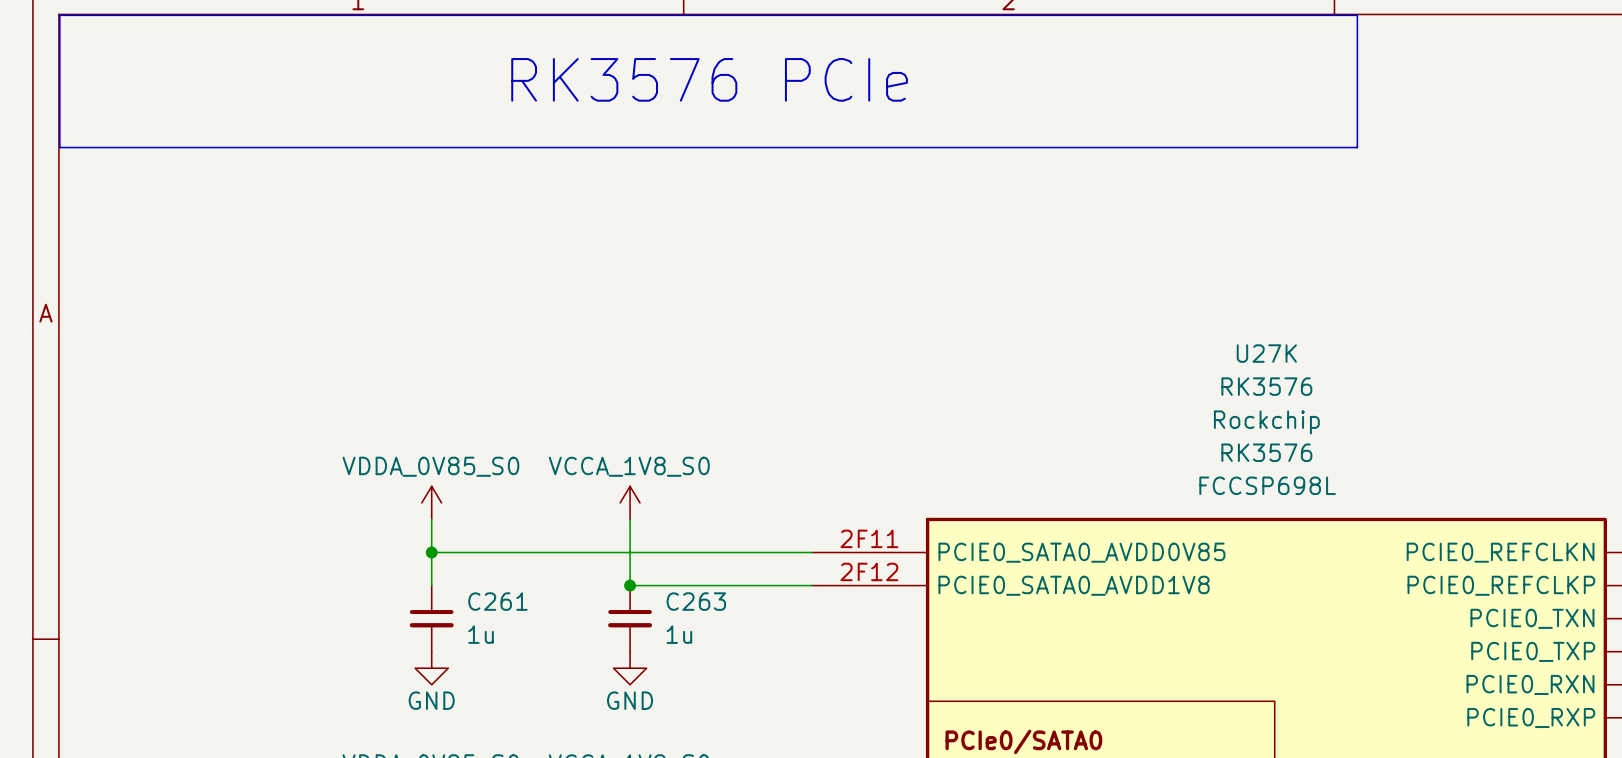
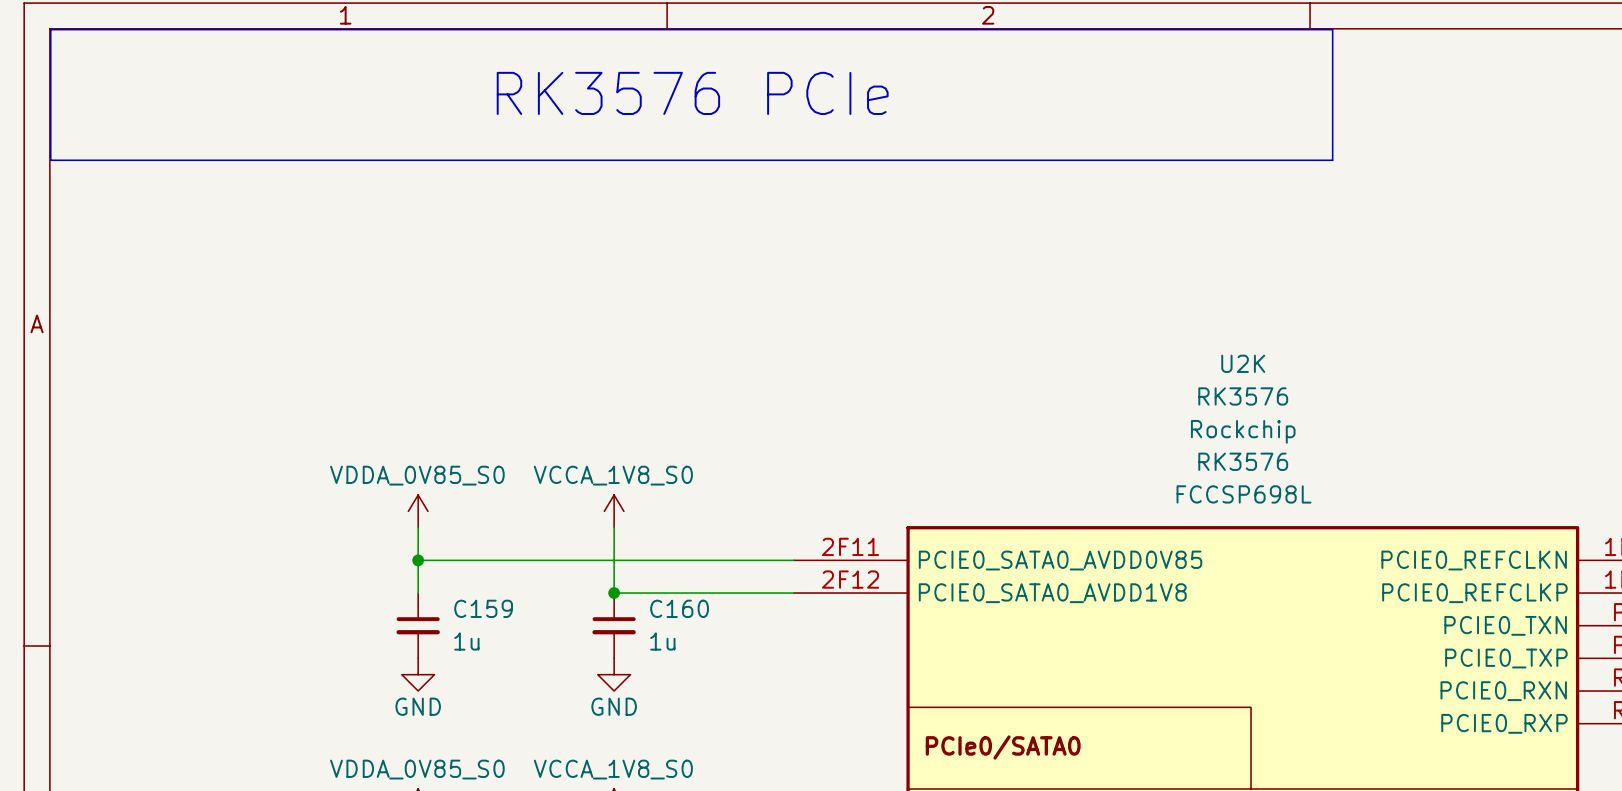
U27K name: U27K (1266, 353) -> U2K (1243, 363)
C261 name: C261 (497, 601) -> C159 (483, 608)
C263 name: C263 (696, 601) -> C160 (679, 608)

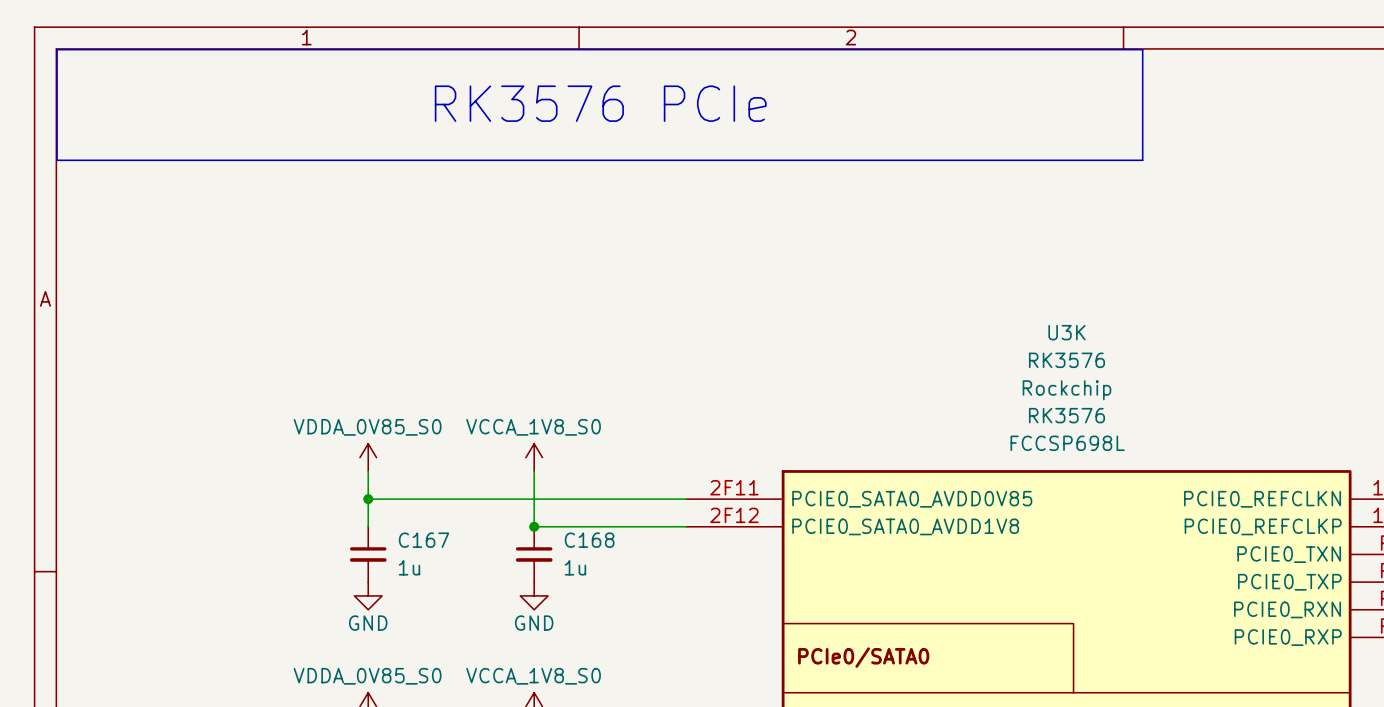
U2K name: U2K (1243, 363) -> U3K (1066, 332)
C159 name: C159 (483, 608) -> C167 (423, 540)
C160 name: C160 (679, 608) -> C168 (589, 540)

